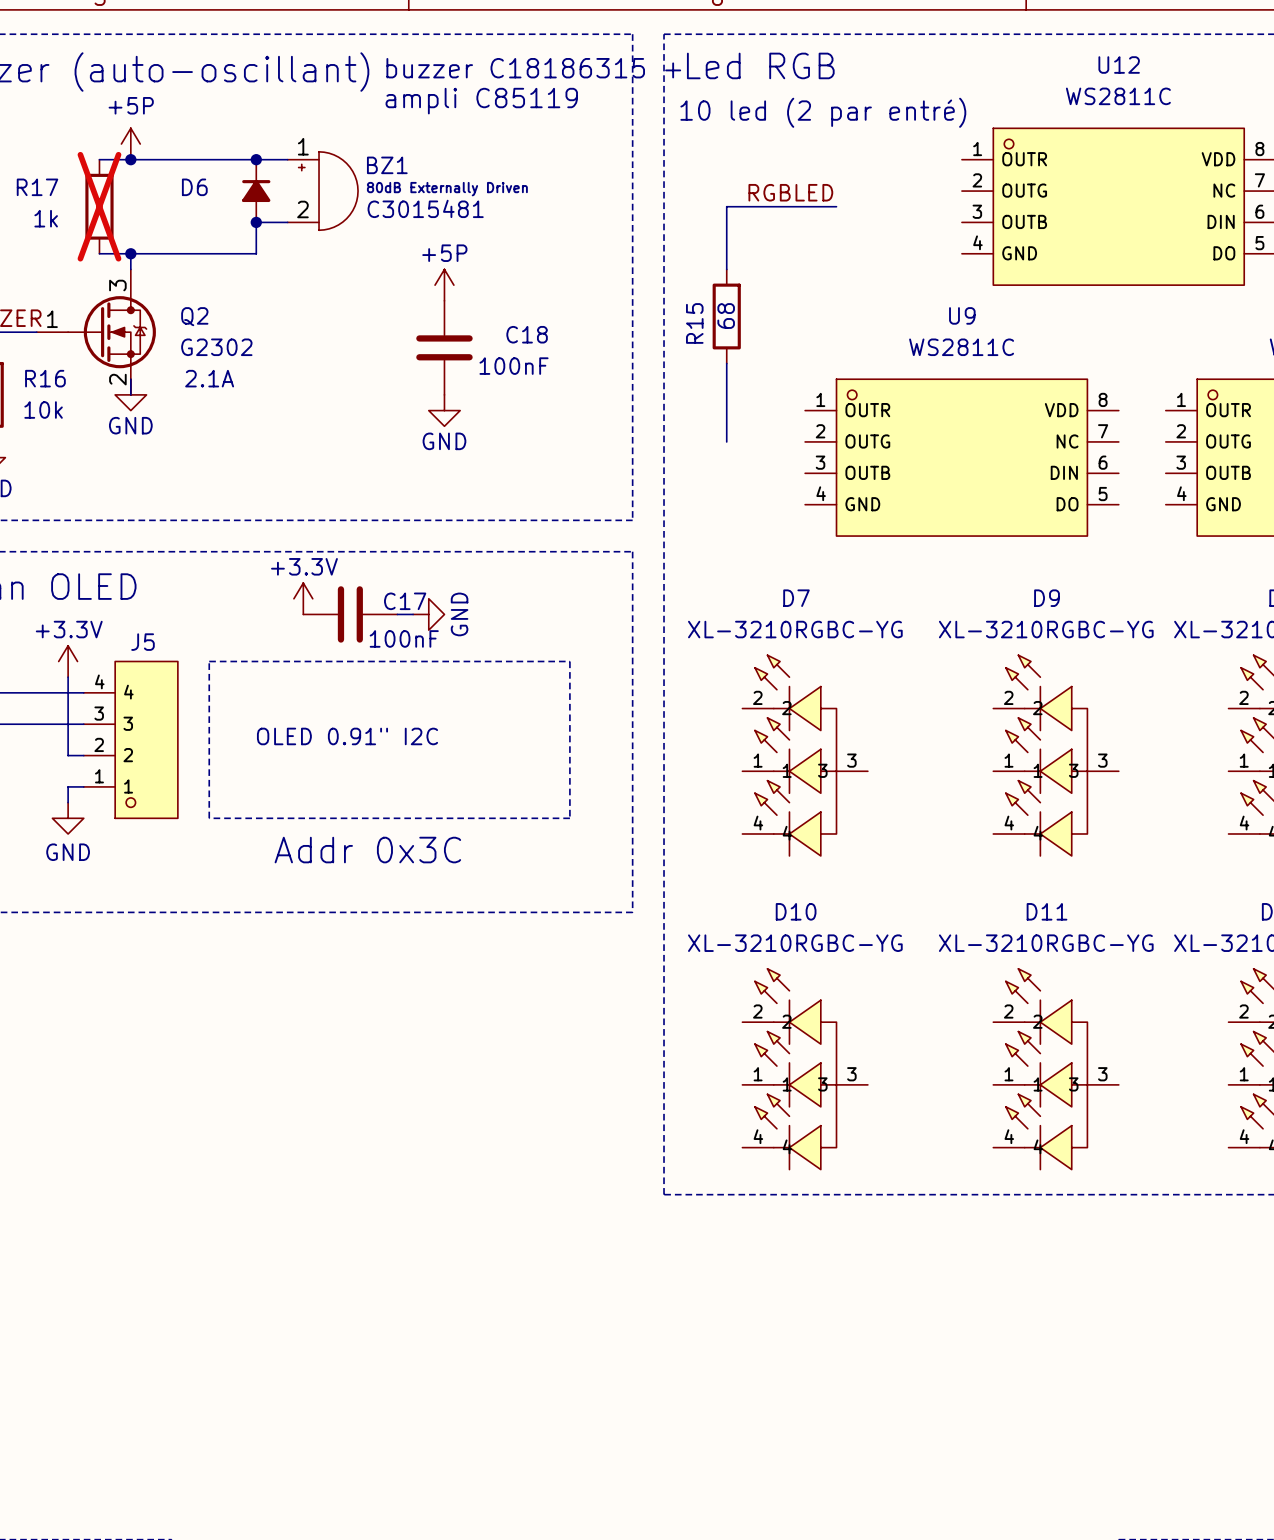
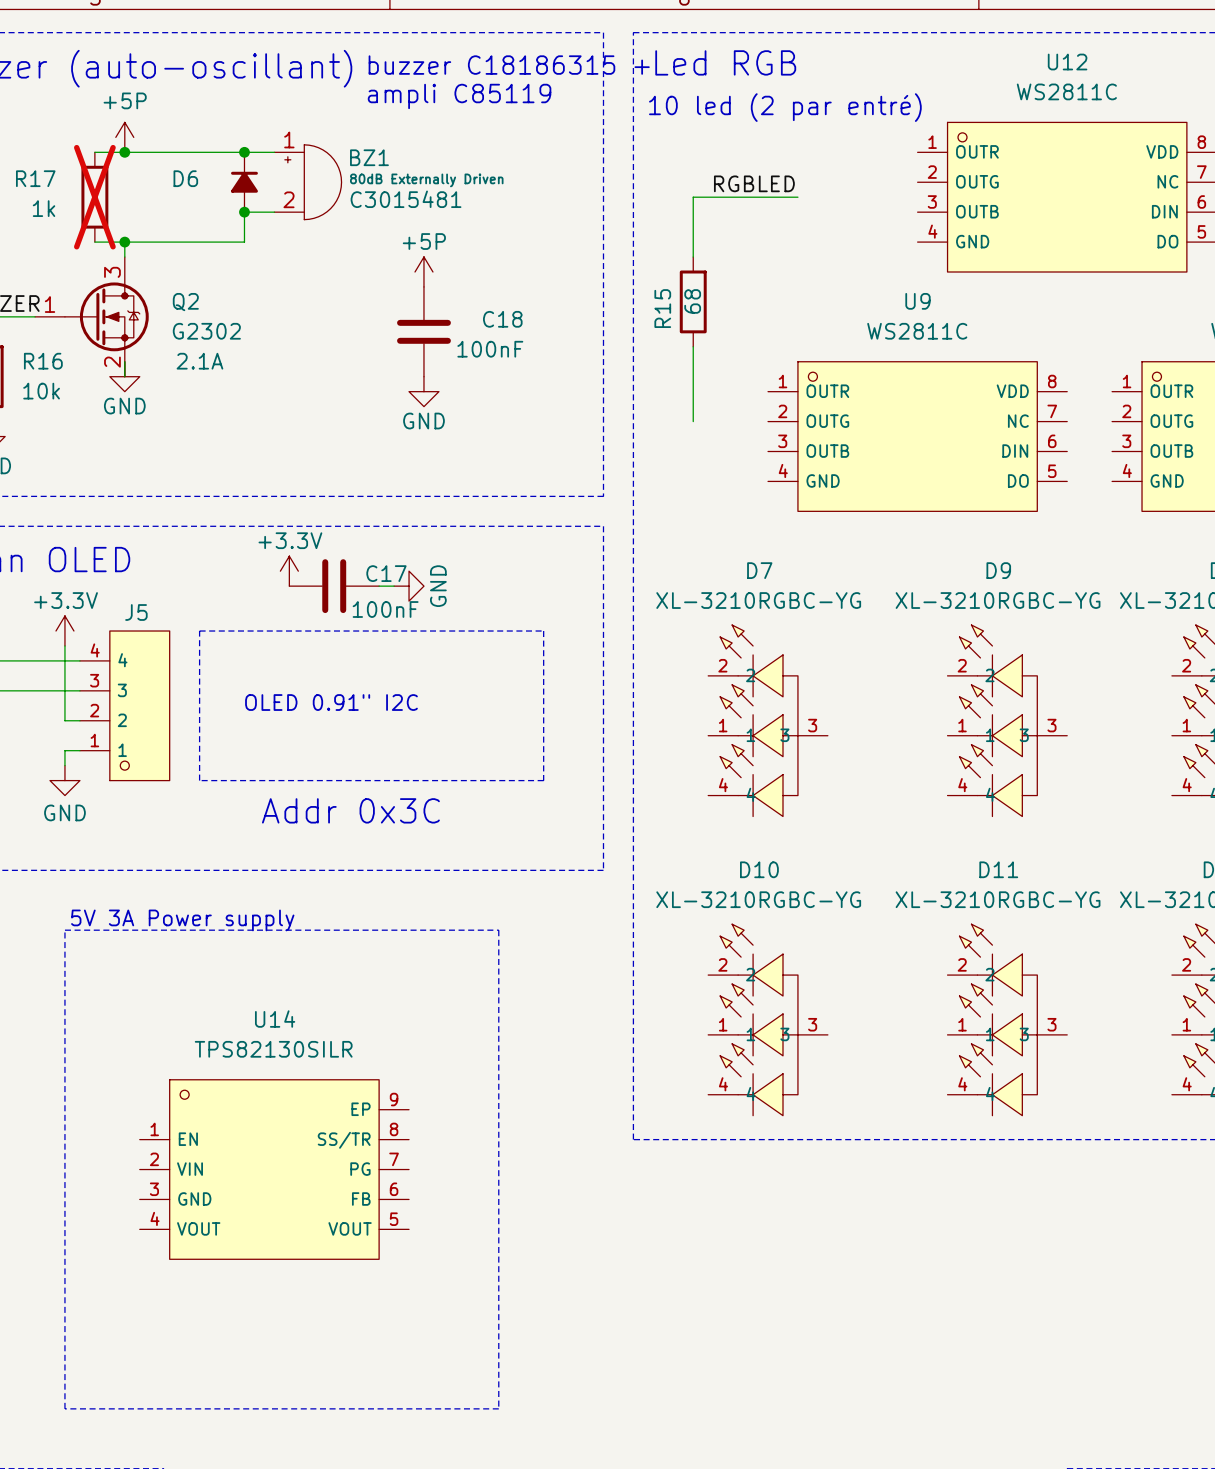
text: none -> 5V 3A Power supply (182, 920)
line: none -> (64, 930) (498, 930) (498, 1408) (64, 1408) (64, 930)
U14: none -> TPS82130SILR (274, 1169)

